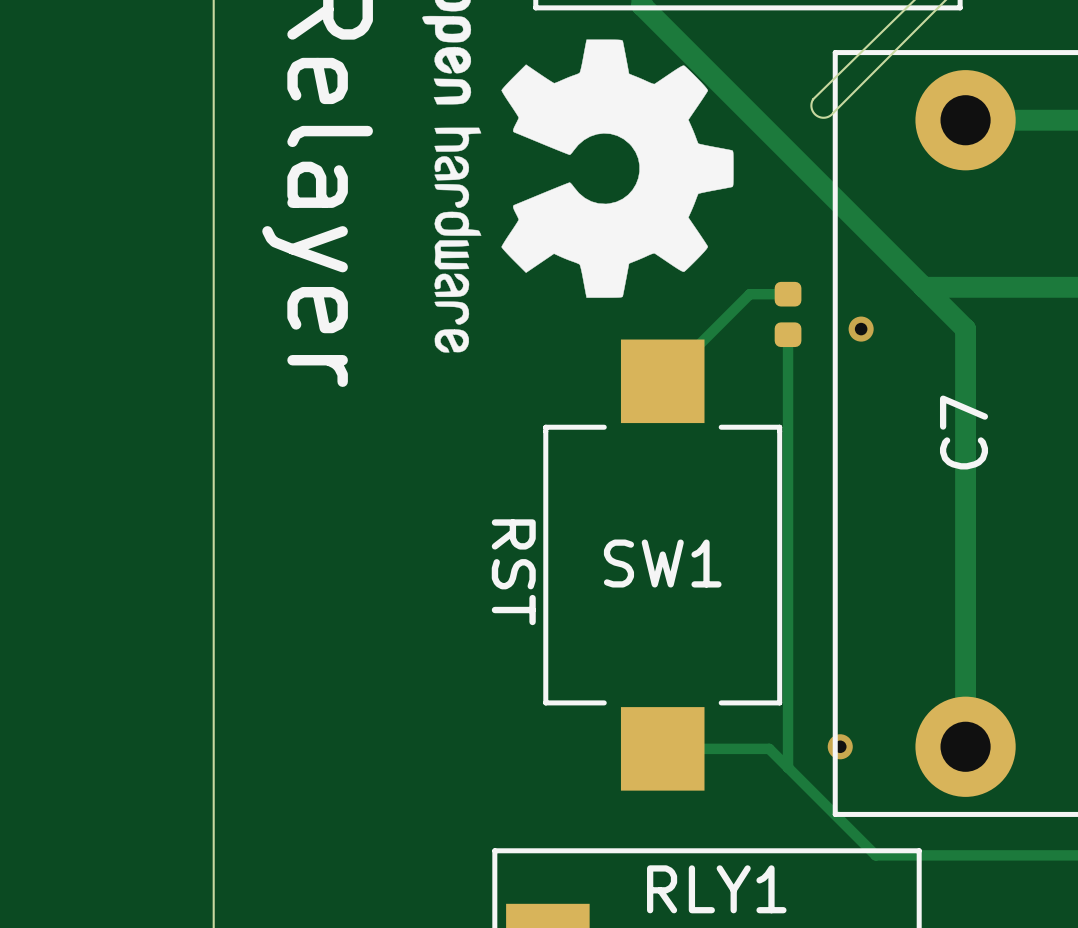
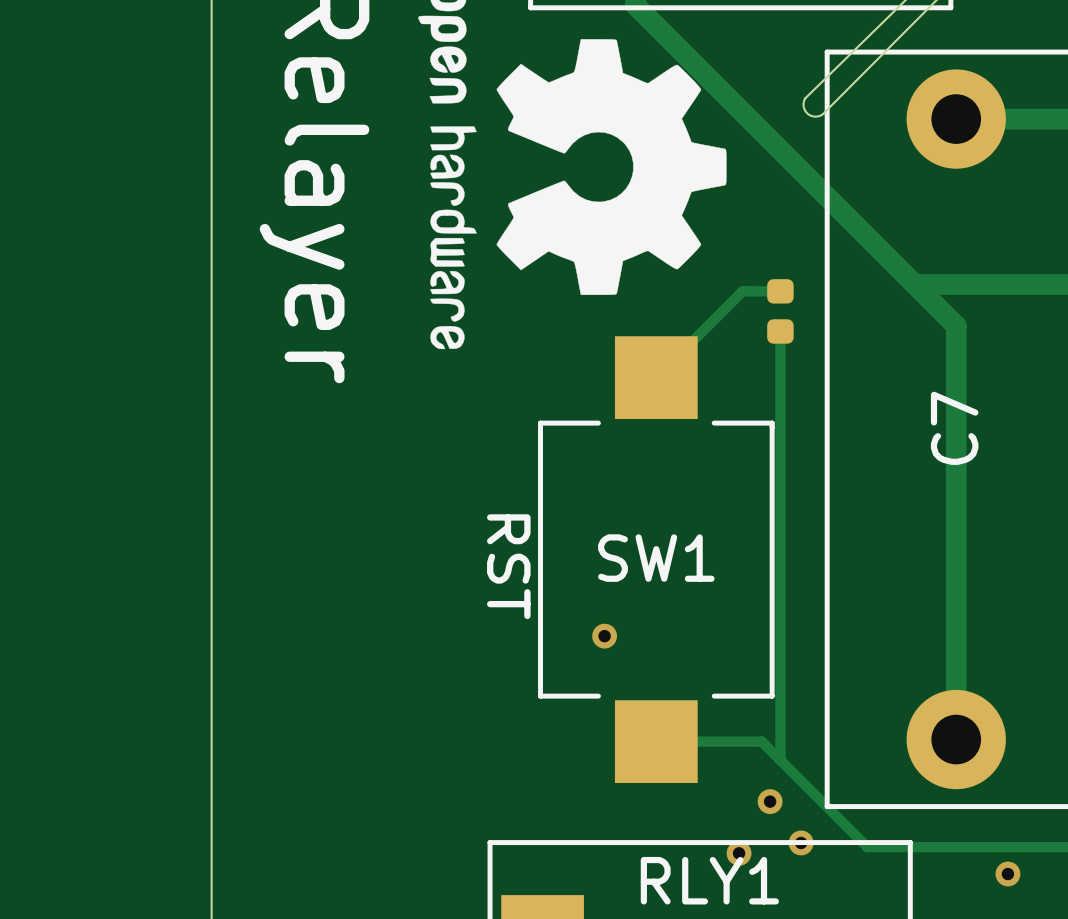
via: (861, 329) -> none
via: none -> (604, 636)
via: (840, 746) -> none
via: none -> (770, 801)
via: none -> (801, 842)
via: none -> (739, 853)
via: none -> (1007, 873)

